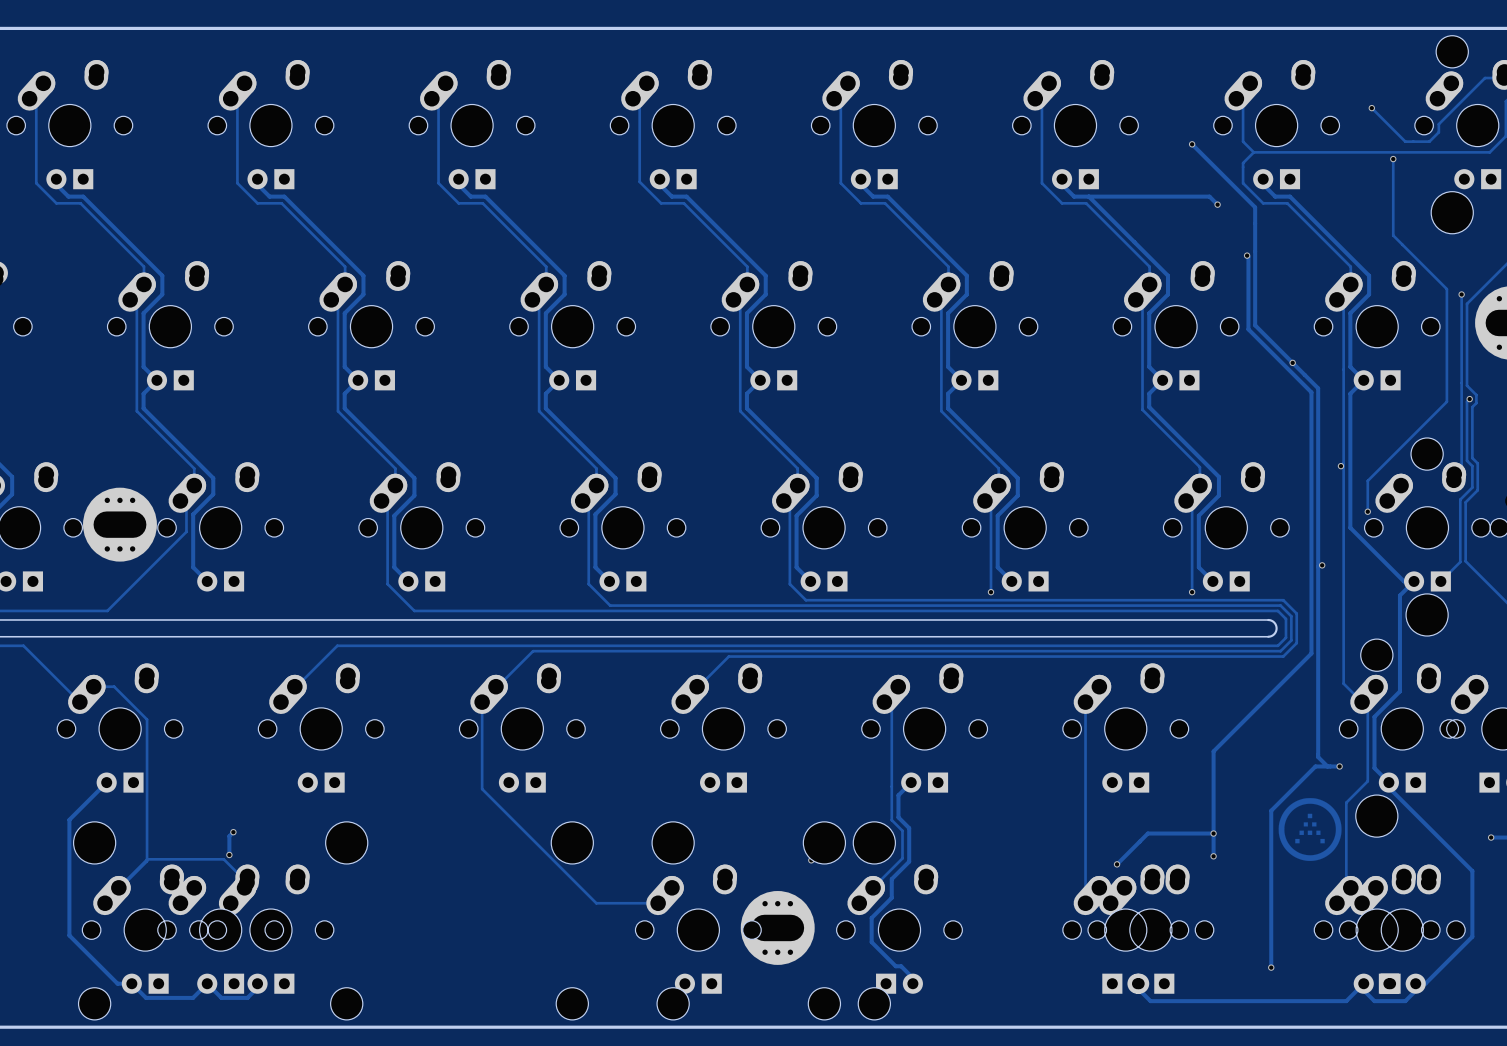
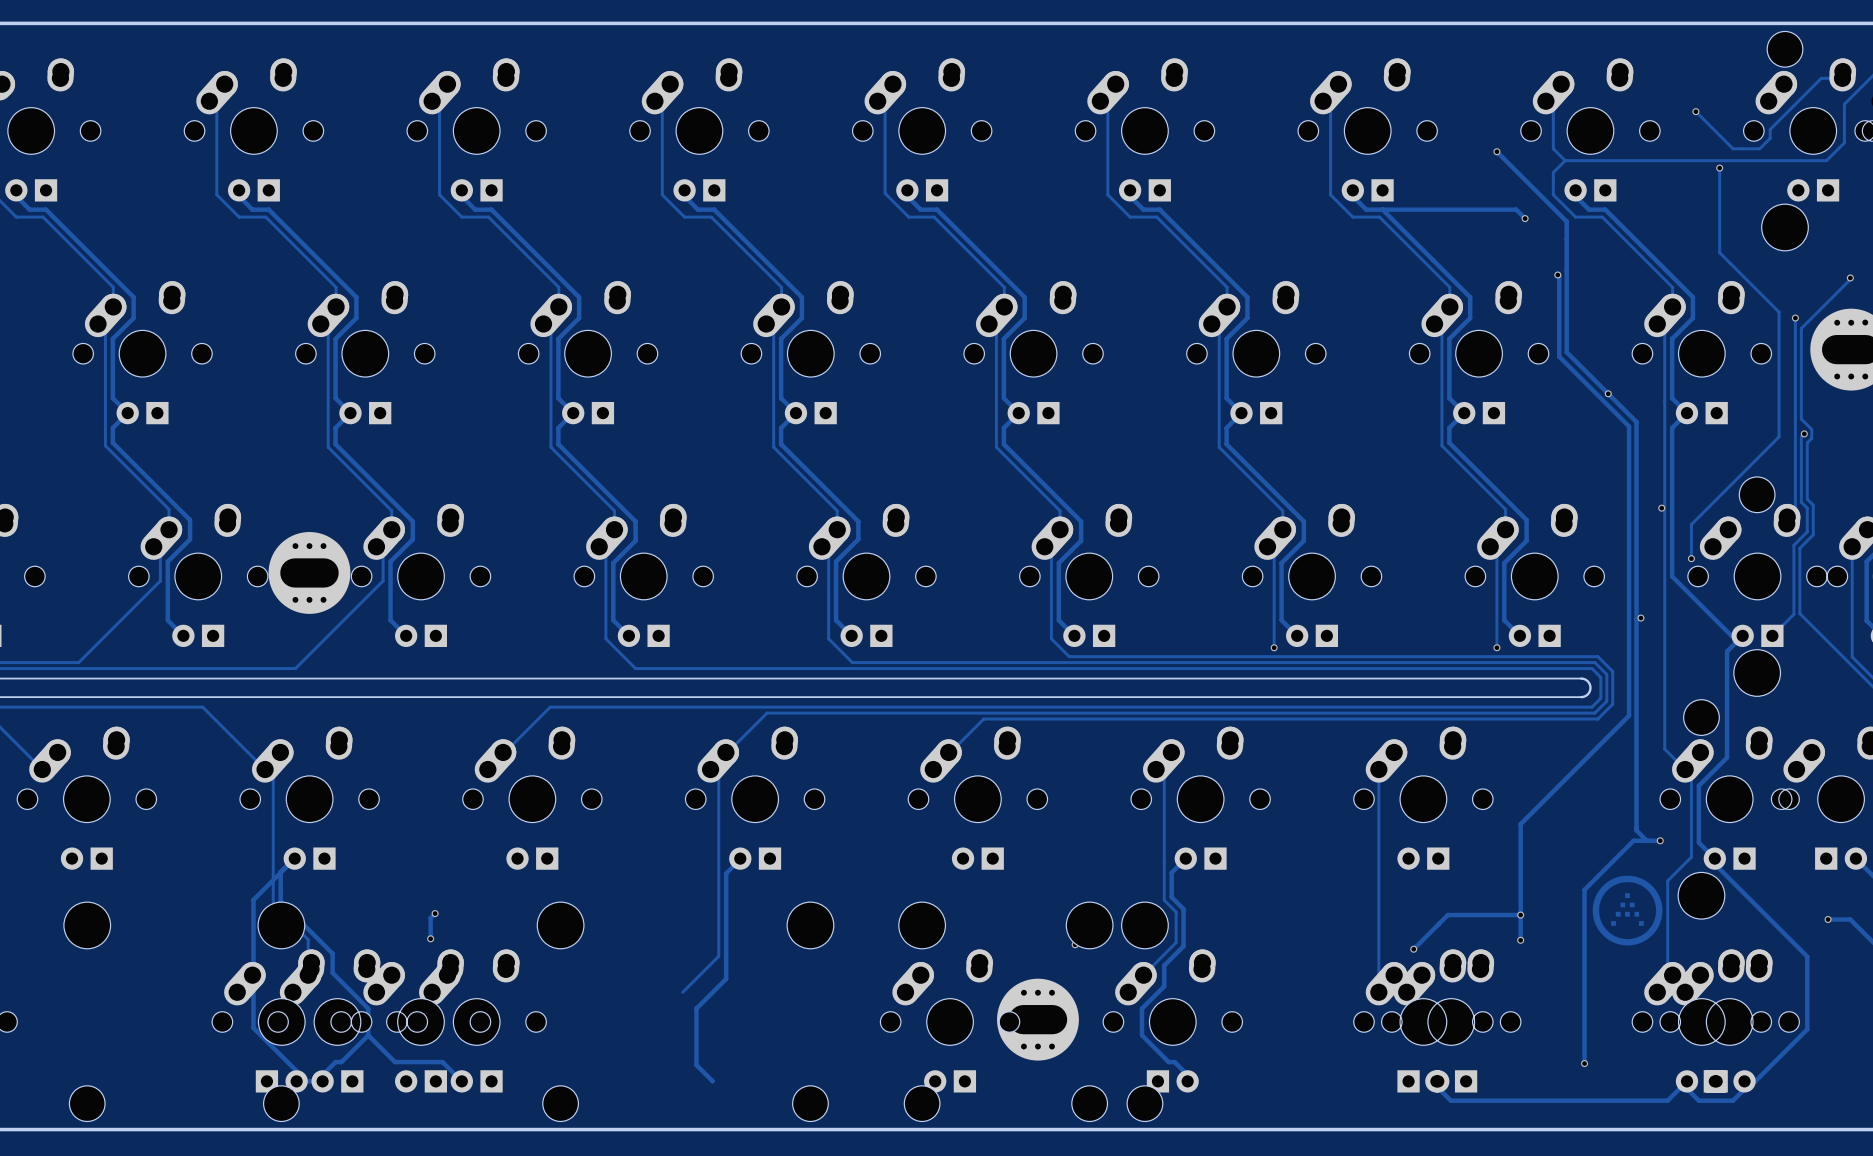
track: (93, 686) (114, 686) (147, 719) (147, 861) (105, 903) -> none
track: (482, 702) (482, 789) (596, 903) (658, 903) -> none
track: none -> (718, 777) (718, 956) (682, 992)
track: none -> (294, 858) (280, 871) (280, 901) (332, 953) (332, 972) (368, 1008) (368, 1035)
track: none -> (740, 859) (726, 873) (726, 978) (696, 1008) (696, 1065) (712, 1081)
track: (247, 882) (223, 859) (147, 859) (118, 887) -> (273, 777) (273, 904) (308, 939) (308, 975)
part: none -> (281, 1020)
track: none -> (368, 1035) (341, 1062) (335, 1062) (322, 1075)
track: (131, 983) (146, 997) (193, 997) (207, 983) (221, 997) (247, 997) (257, 987) (257, 983) -> (368, 1035) (395, 1062) (442, 1062) (461, 1081)

